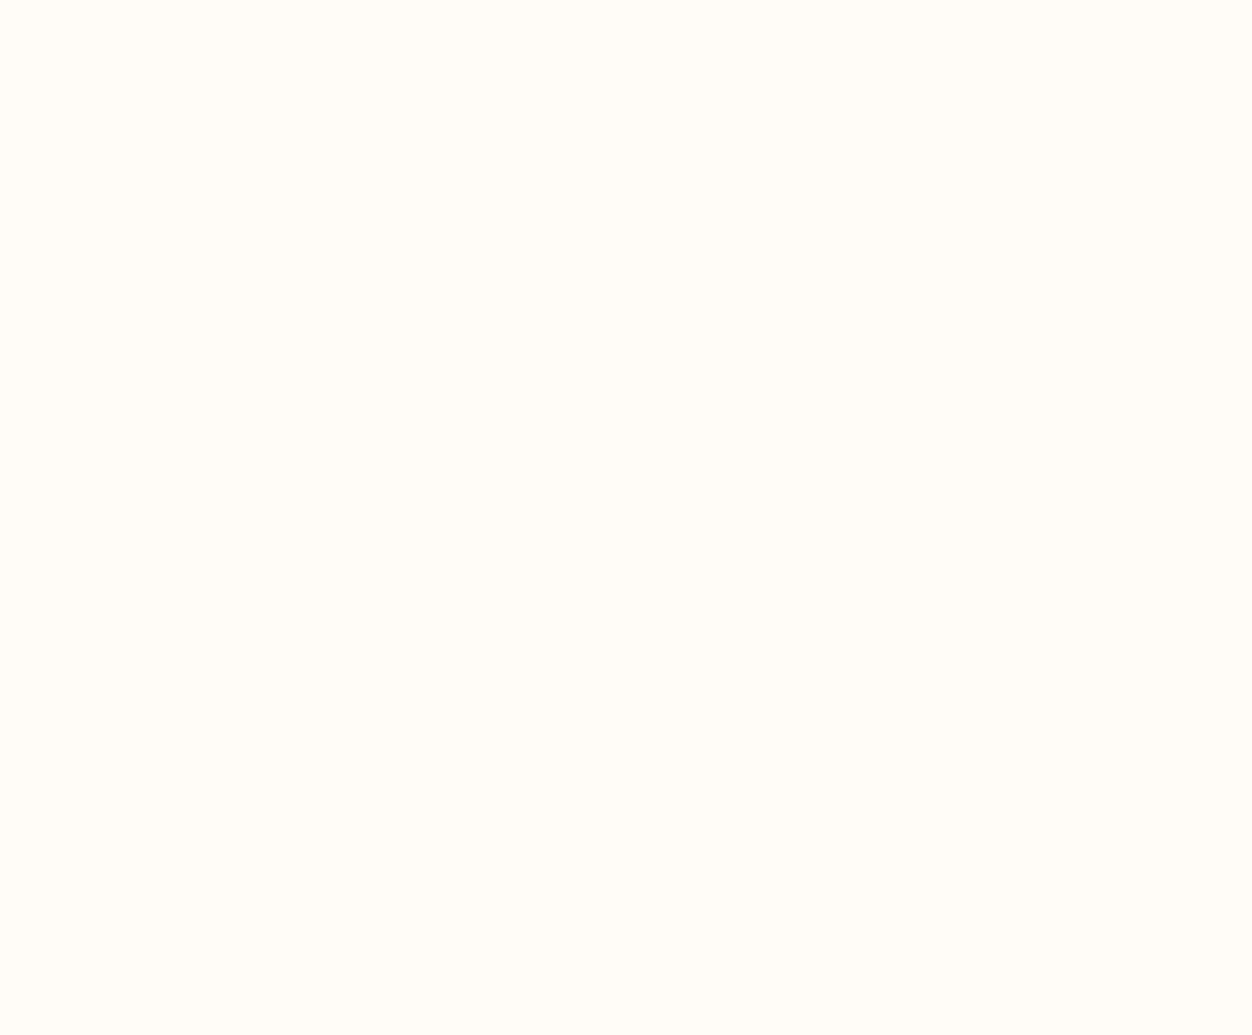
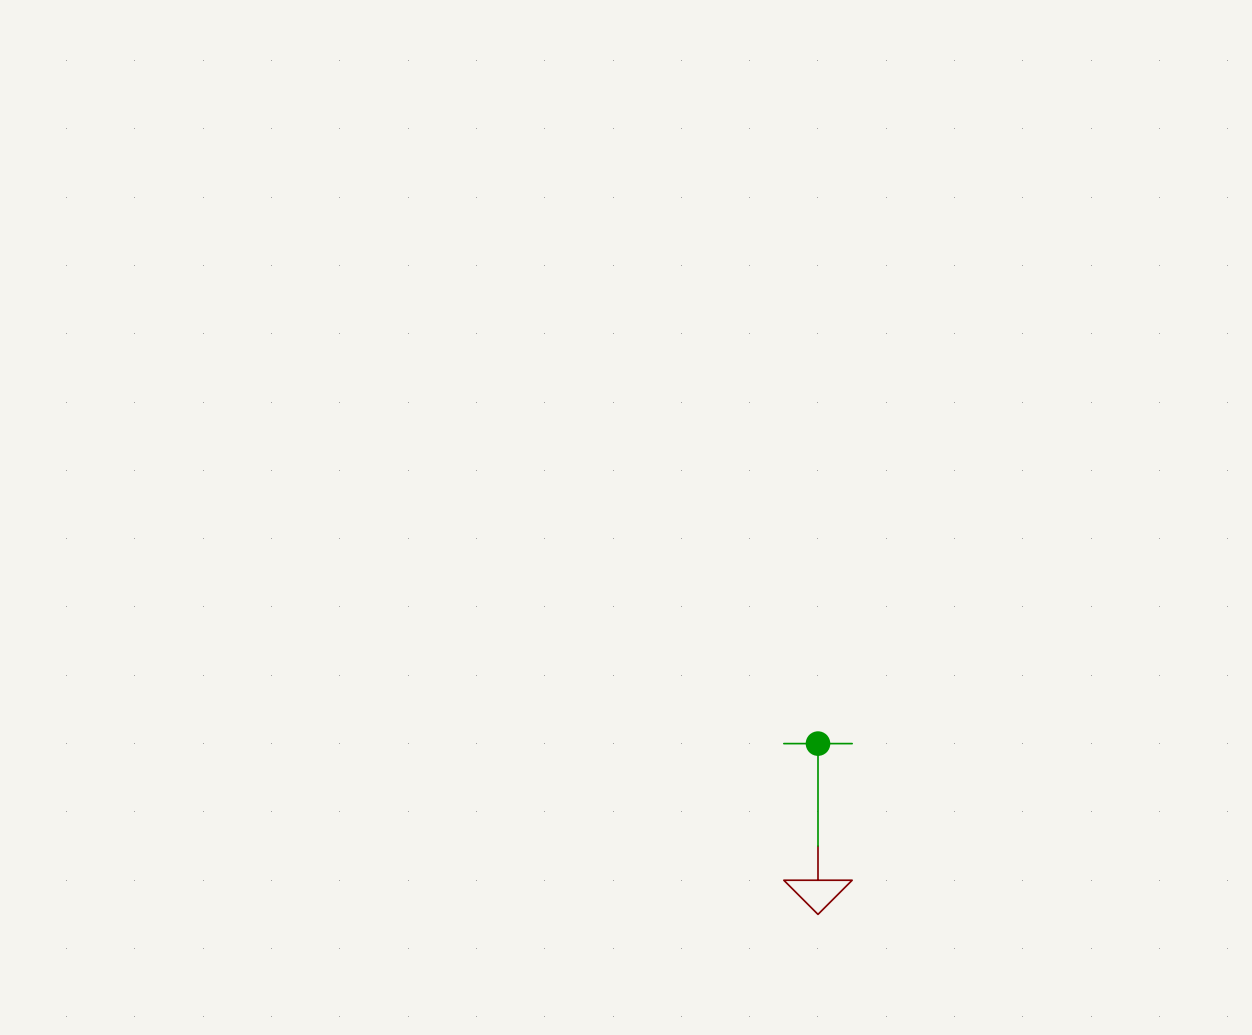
wire: none -> (783, 743) (852, 743)
wire: none -> (817, 743) (817, 846)
junction: none -> (817, 743)
power symbol: none -> (817, 880)

